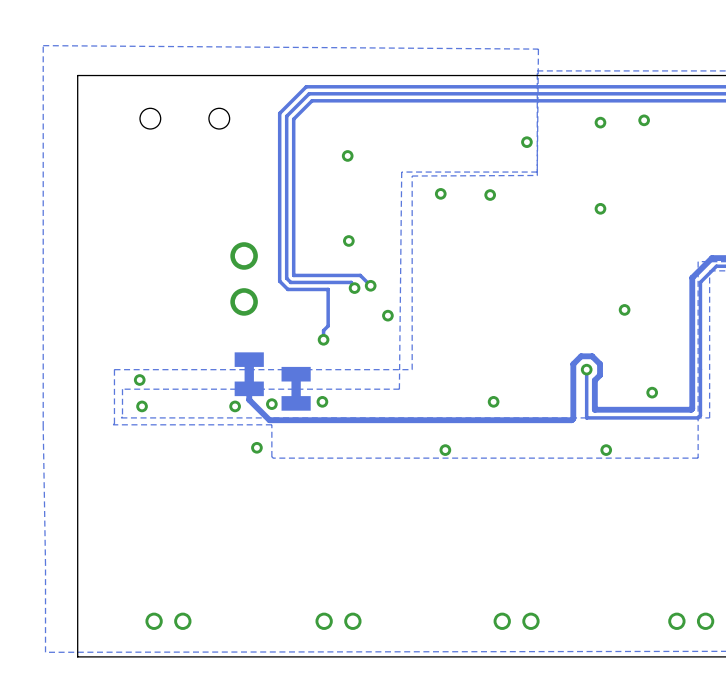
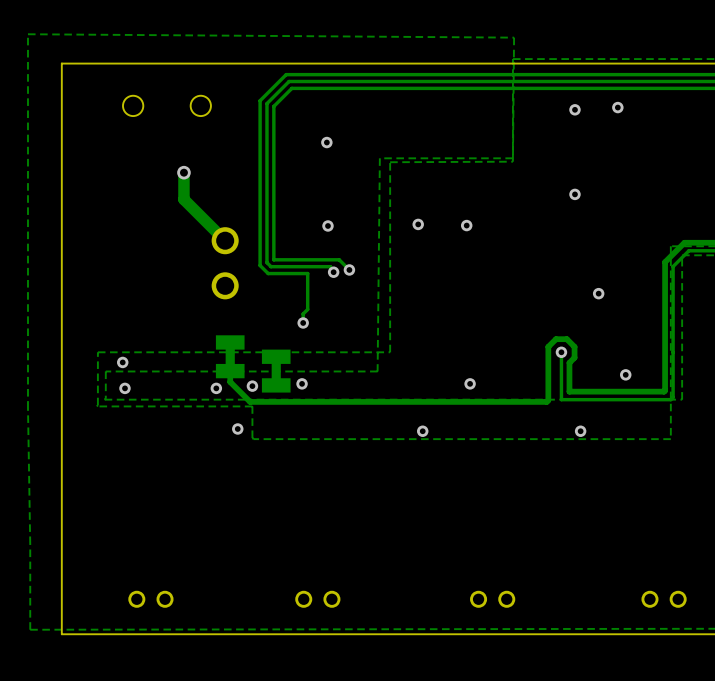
via: (526, 142) -> none
track: none -> (183, 172) (183, 199) (225, 240)
via: none -> (183, 172)
via: (440, 193) -> none
via: (490, 195) -> none
via: none -> (418, 224)
via: none -> (466, 225)
via: (387, 315) -> none

